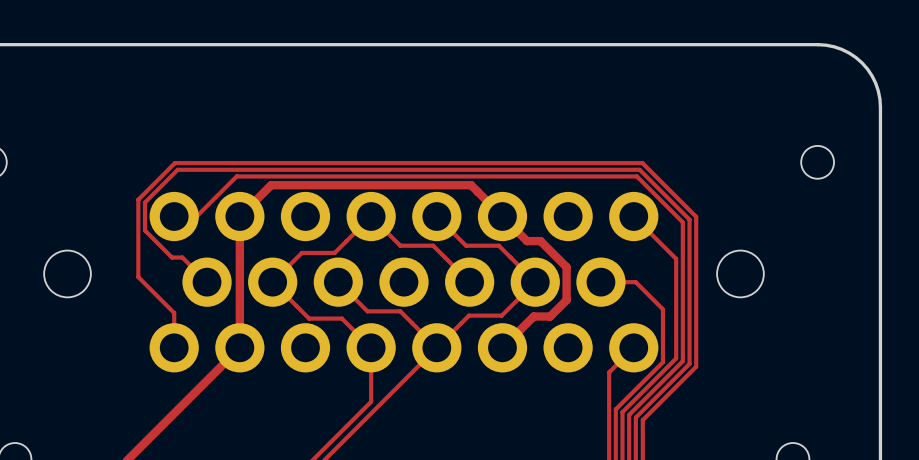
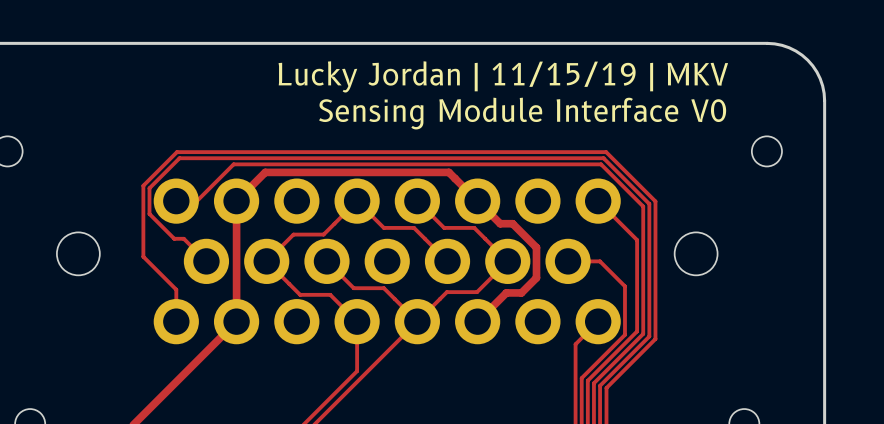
text: none -> Lucky Jordan | 11/15/19 | MKV (503, 76)
text: none -> Sensing Module Interface V0 (522, 113)

